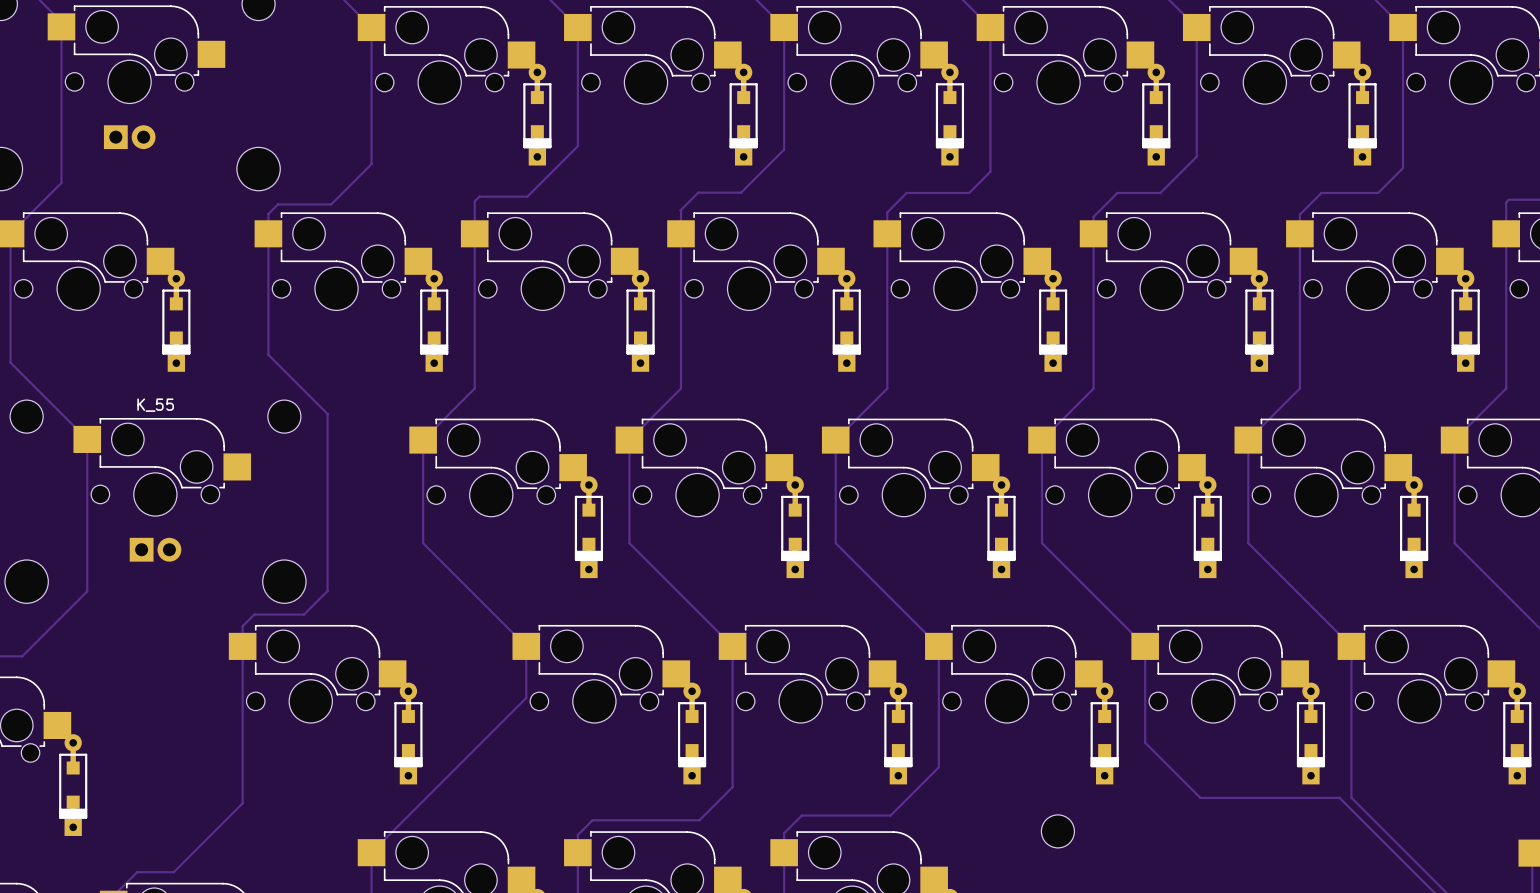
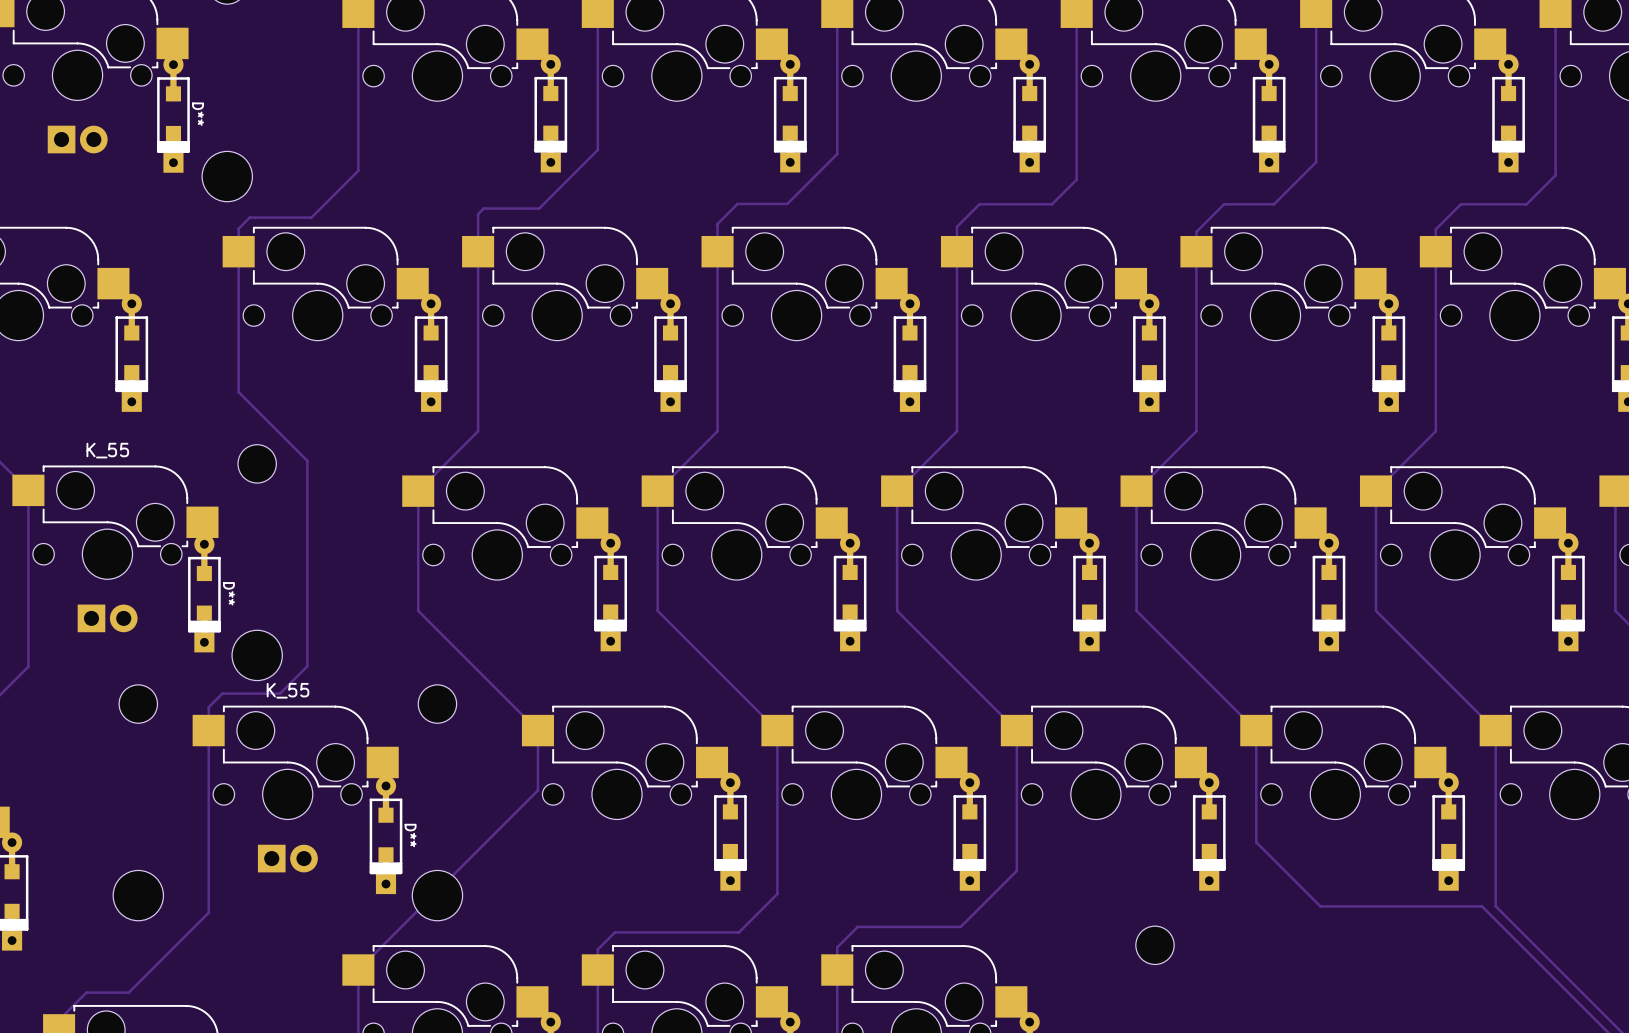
D**: none -> (173, 113)
D**: none -> (204, 593)
part: (325, 704) -> none
K_55: none -> (287, 802)
D**: none -> (386, 835)

